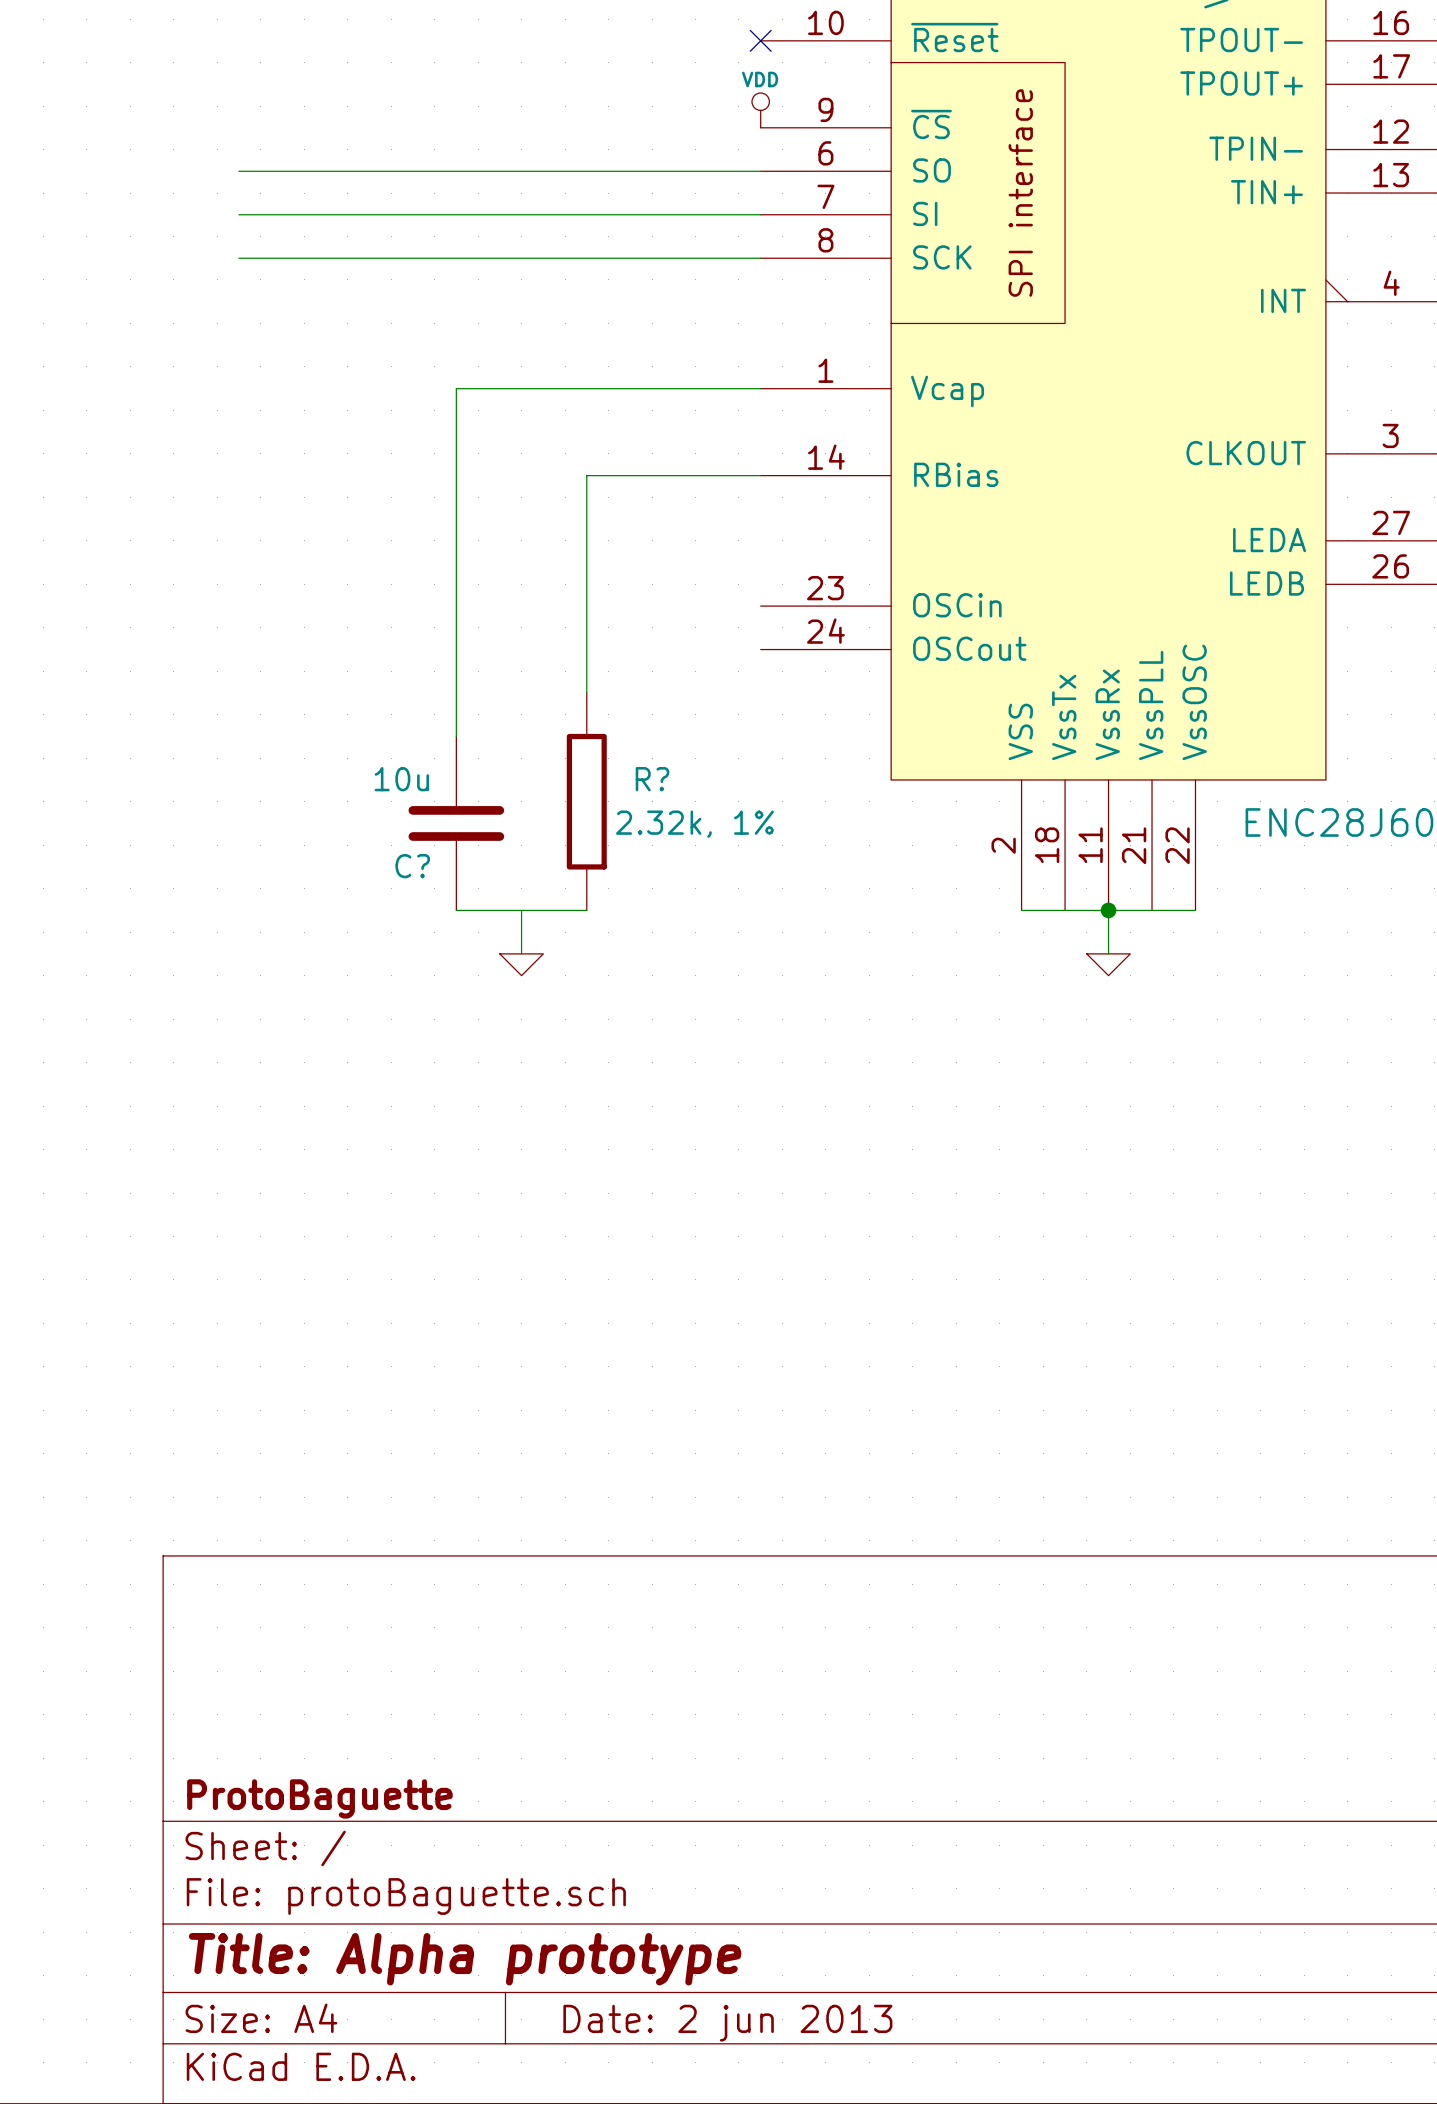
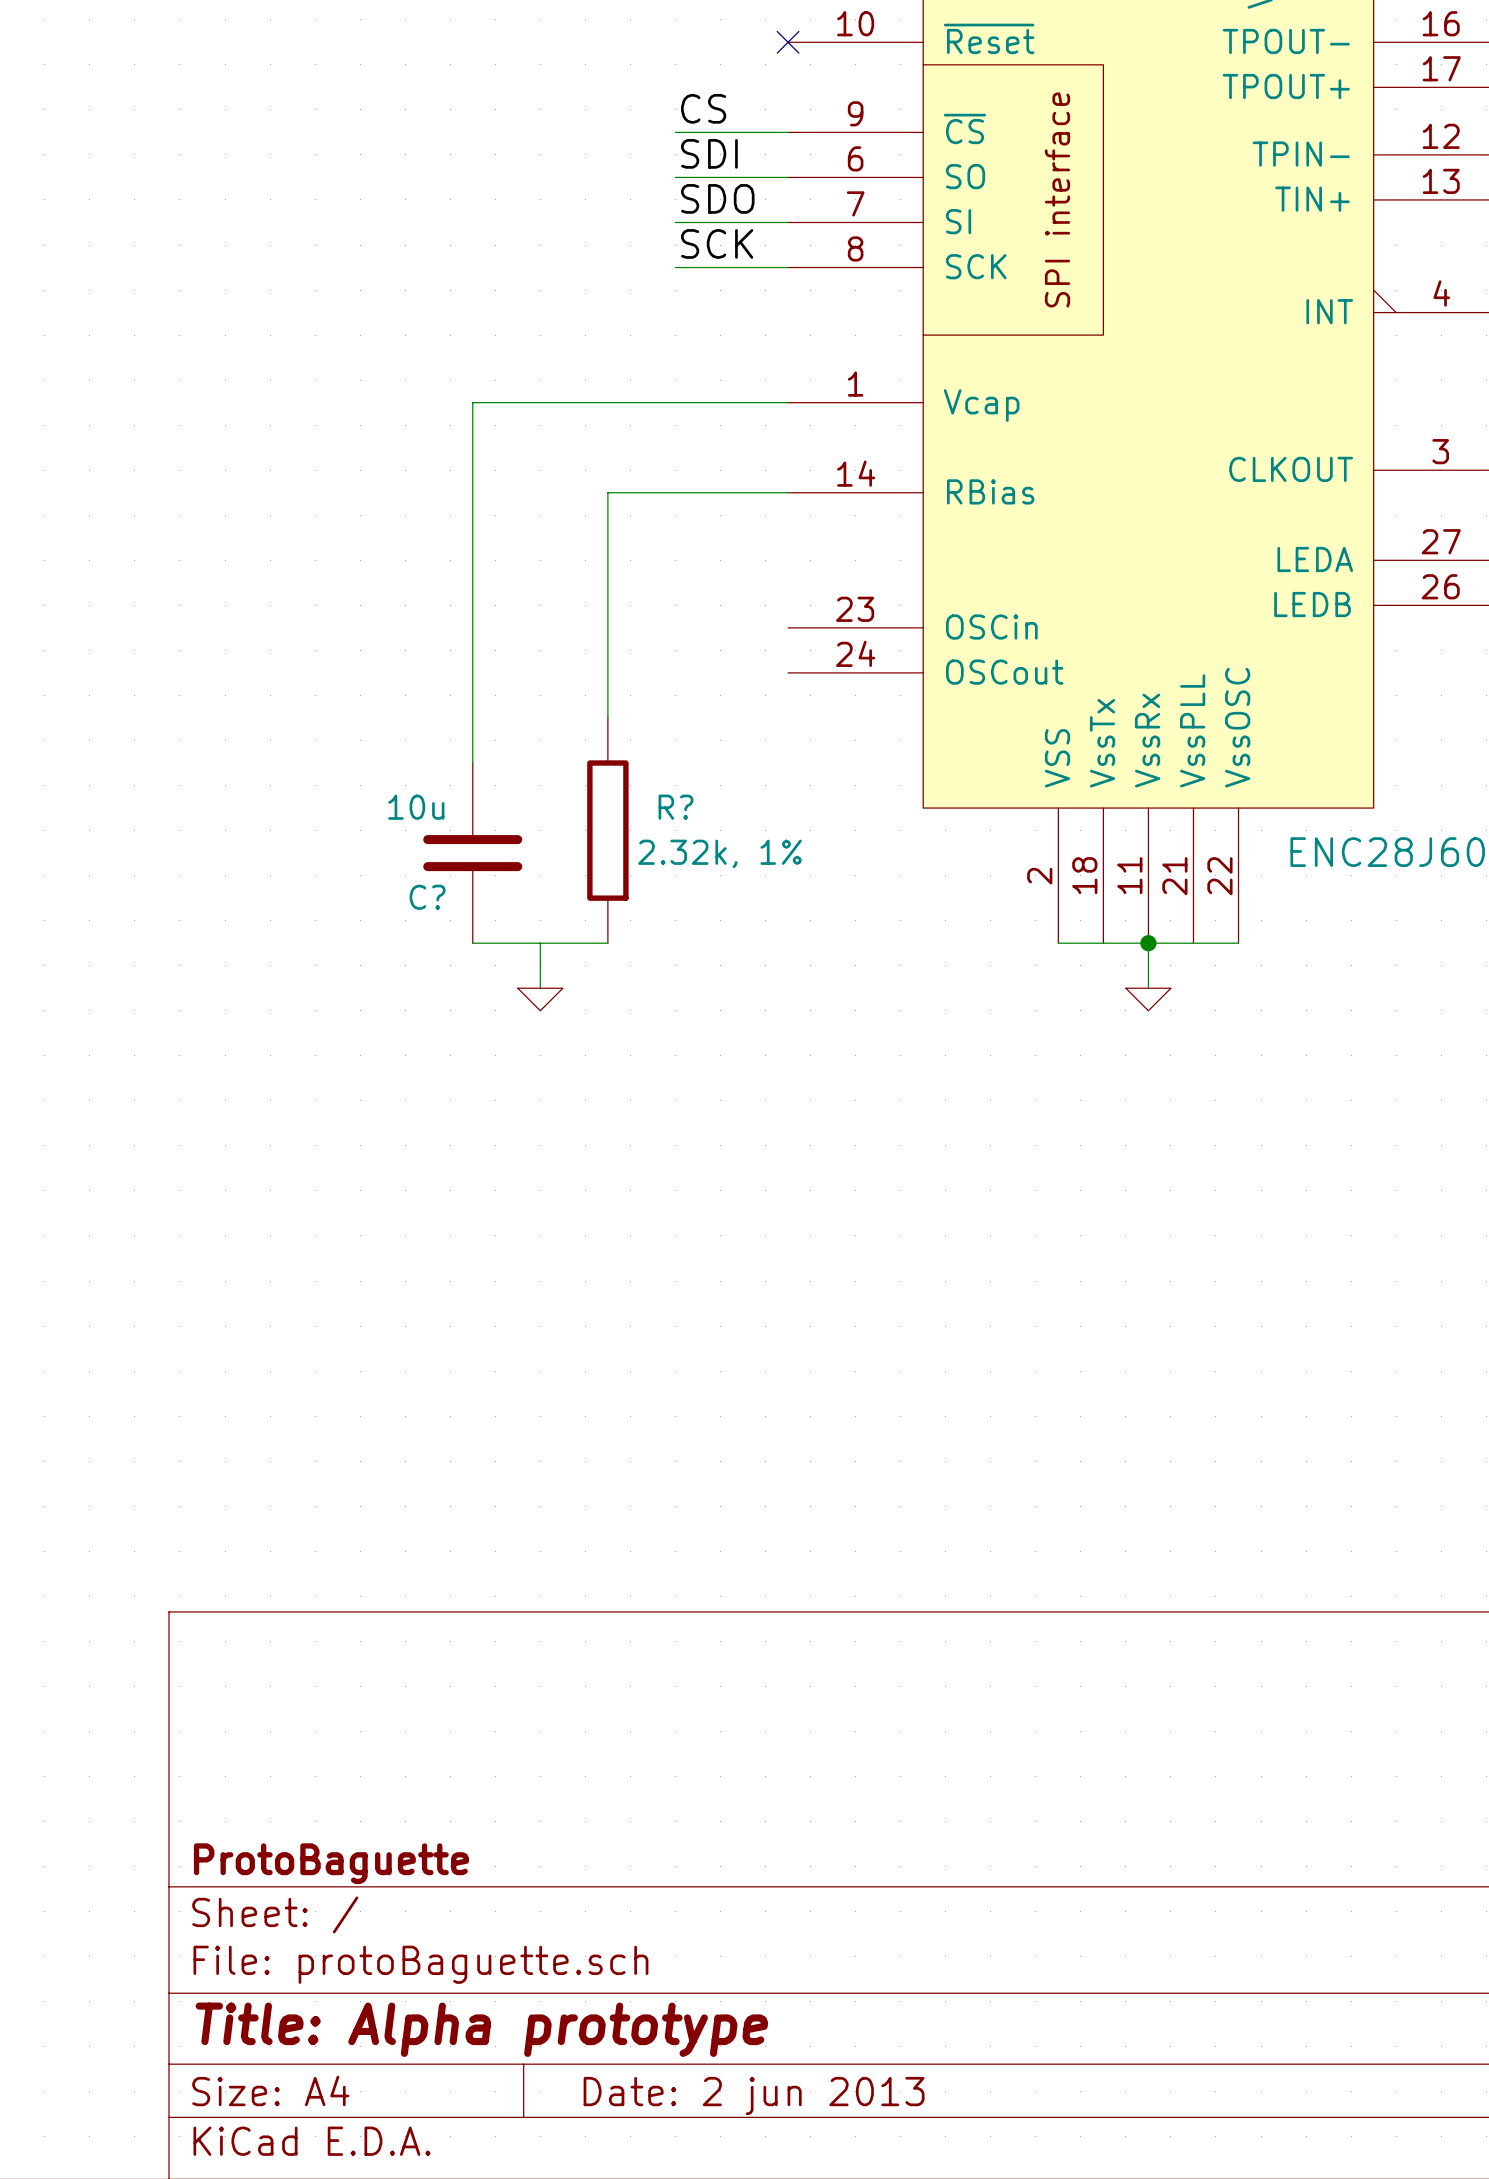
label: none -> CS (703, 108)
power symbol: VDD (760, 110) -> none
wire: none -> (675, 132) (788, 132)
label: none -> SDI (709, 153)
wire: (238, 171) (652, 171) -> none
label: none -> SDO (717, 198)
wire: (238, 214) (652, 214) -> none
label: none -> SCK (717, 243)
wire: (238, 258) (652, 258) -> none

